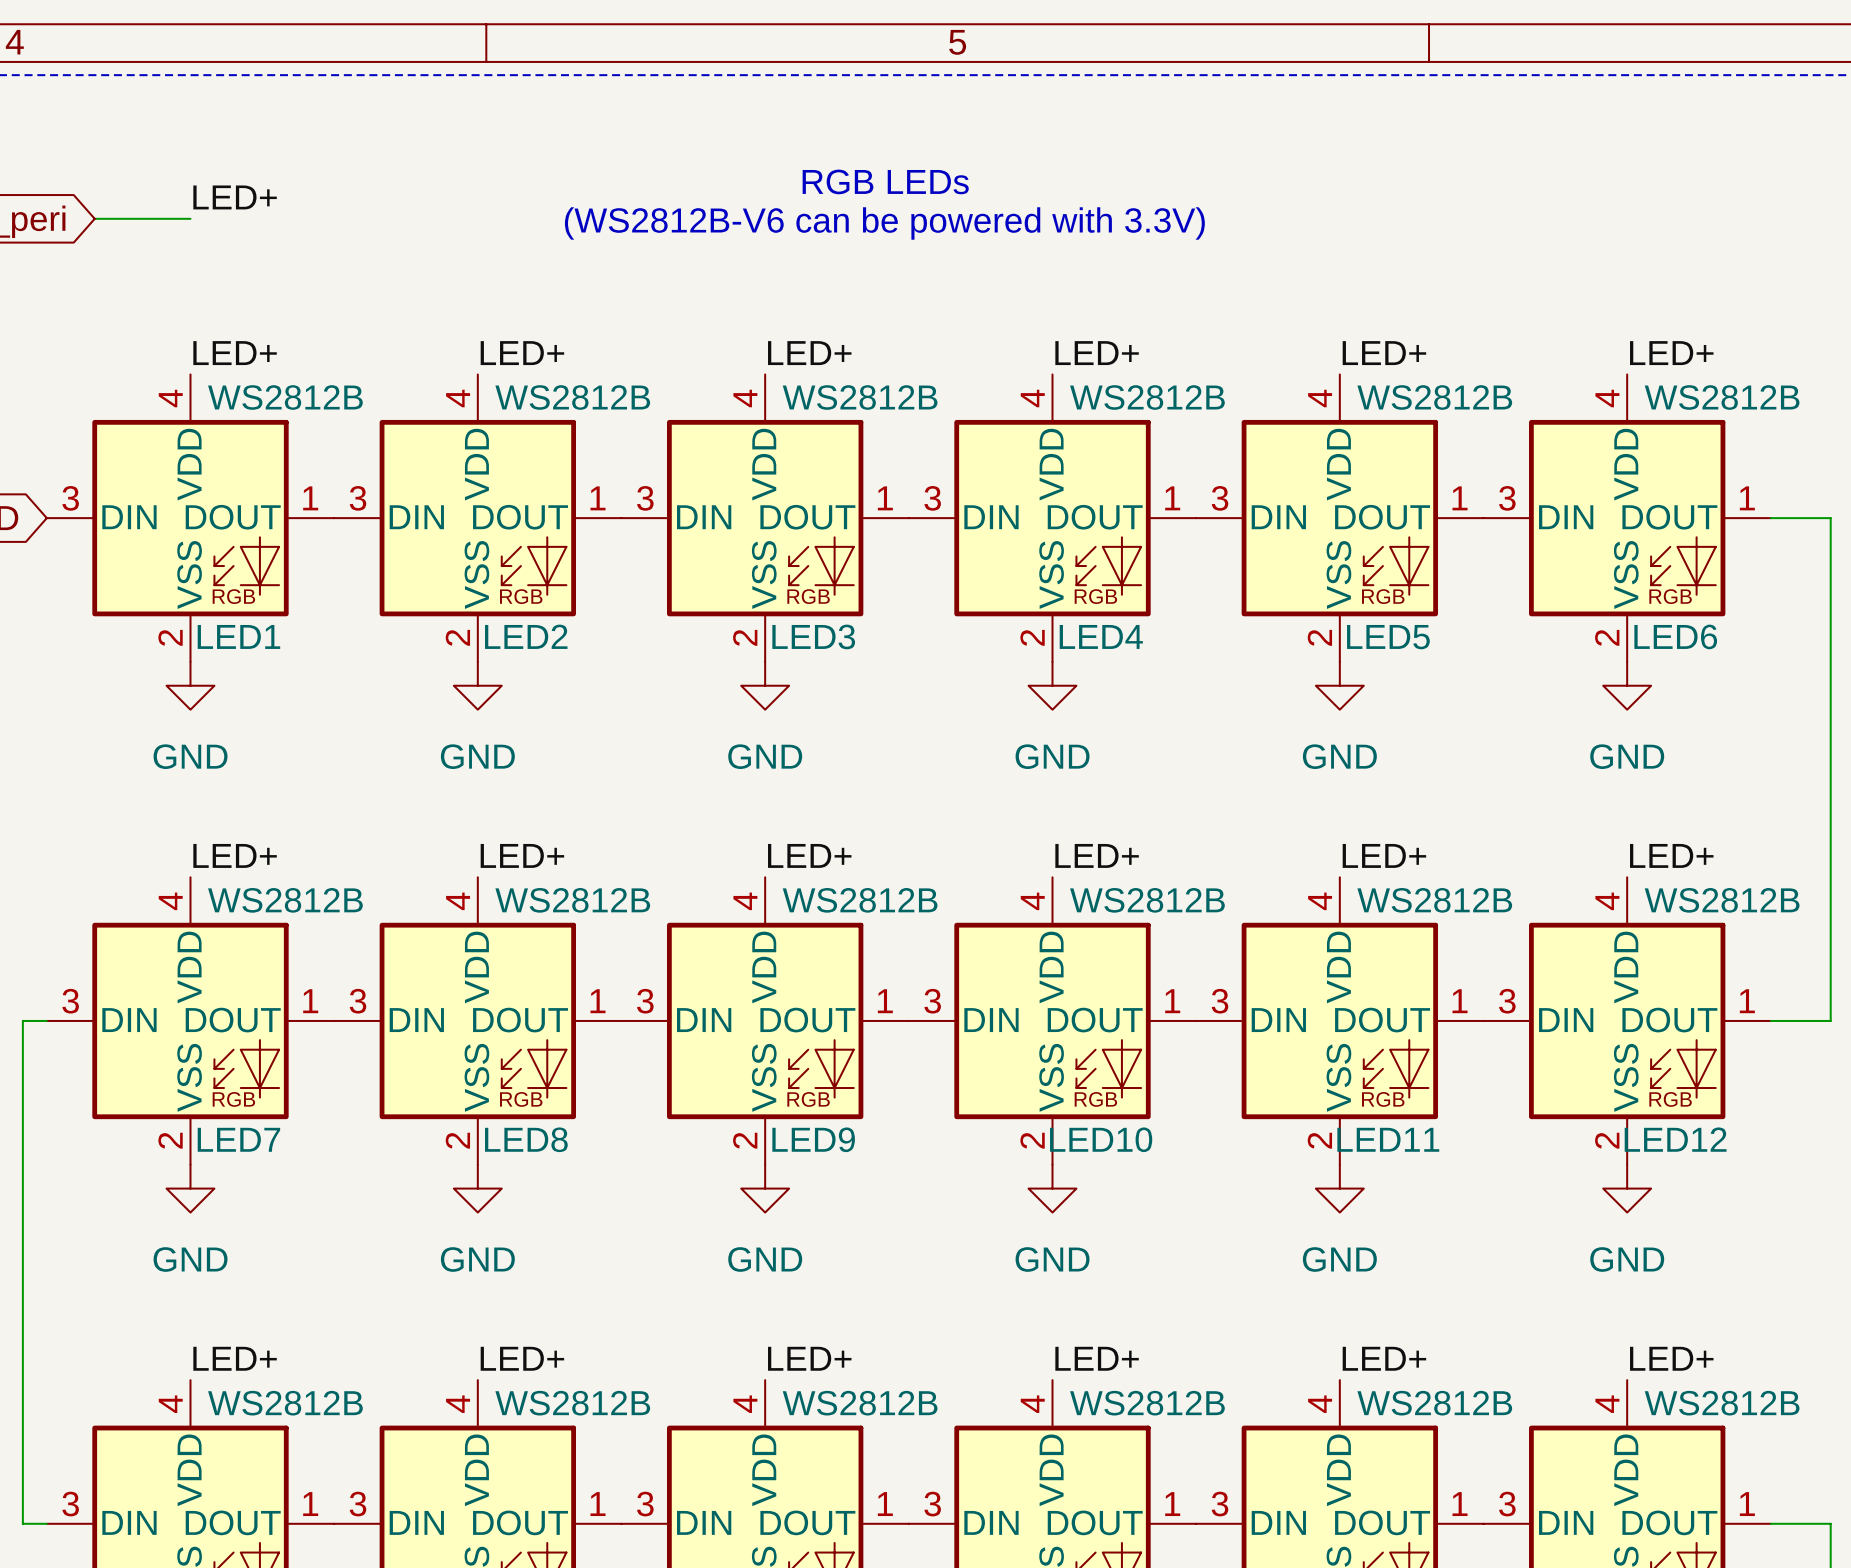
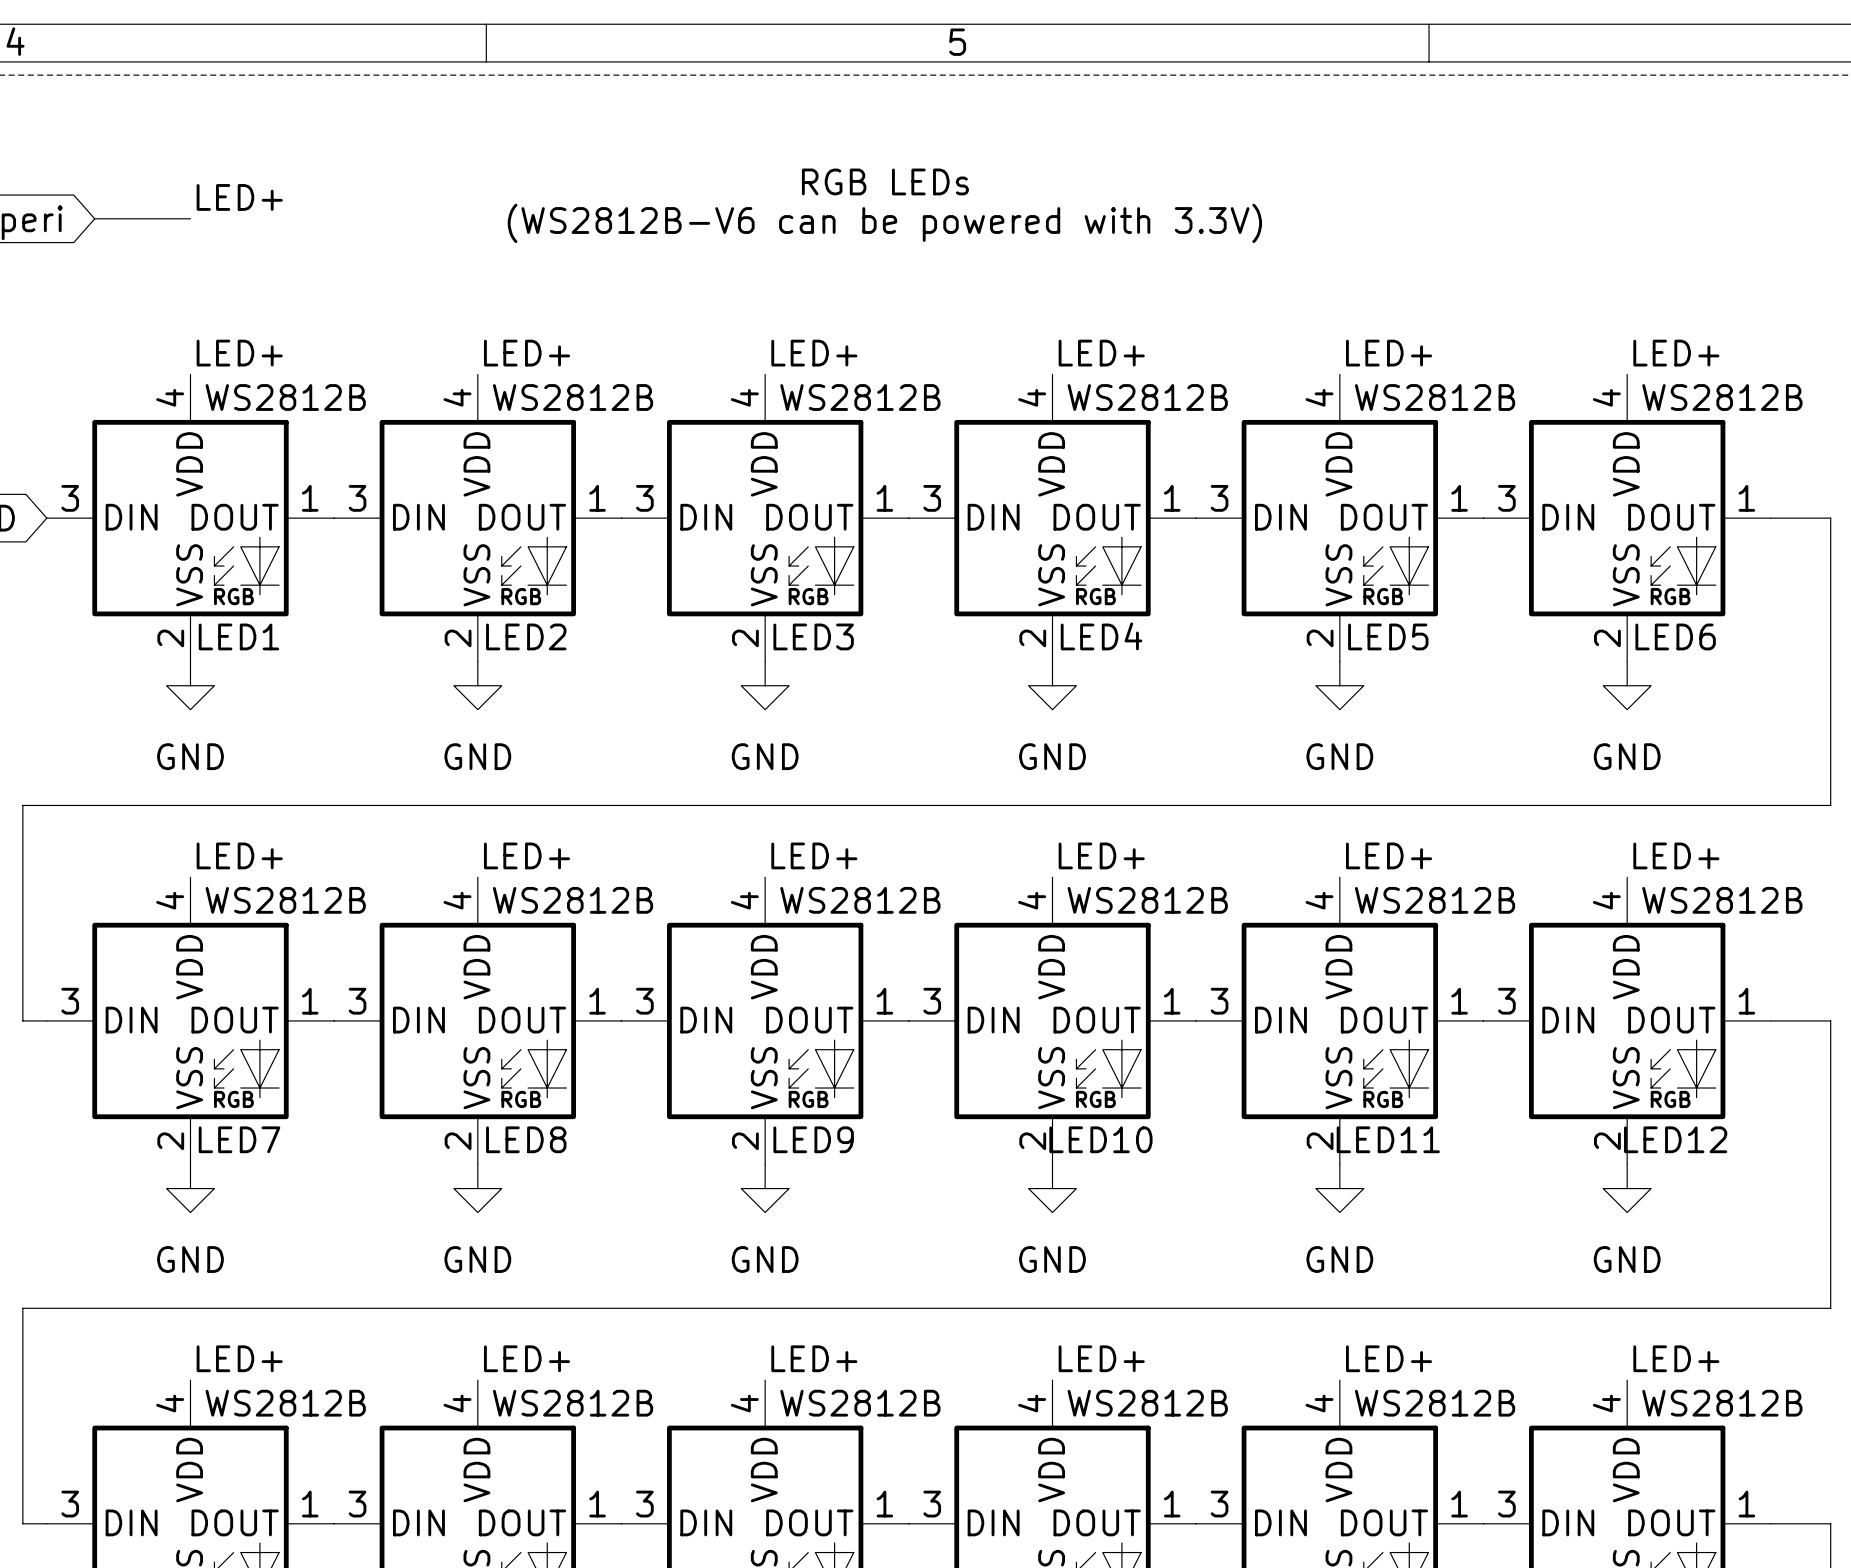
wire: (1830, 805) (1830, 1020) -> (1830, 805) (22, 805) (22, 1020)
wire: (22, 1020) (22, 1308) -> (1830, 1020) (1830, 1308) (22, 1308)

